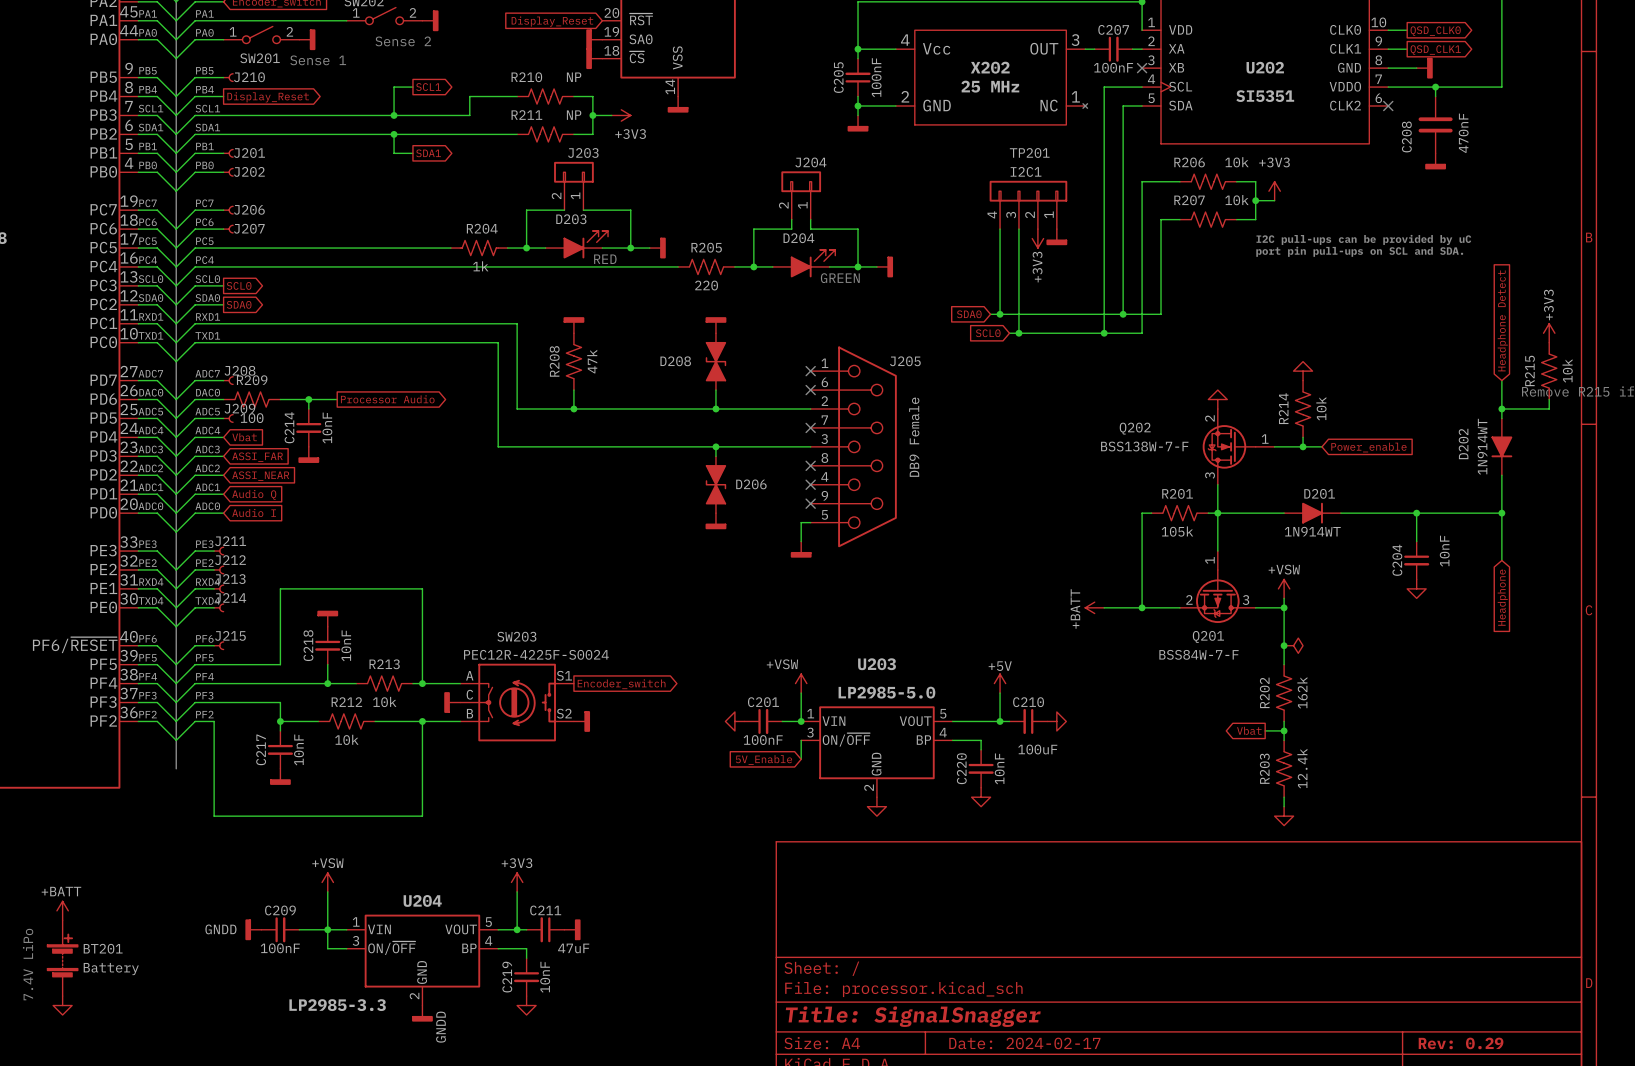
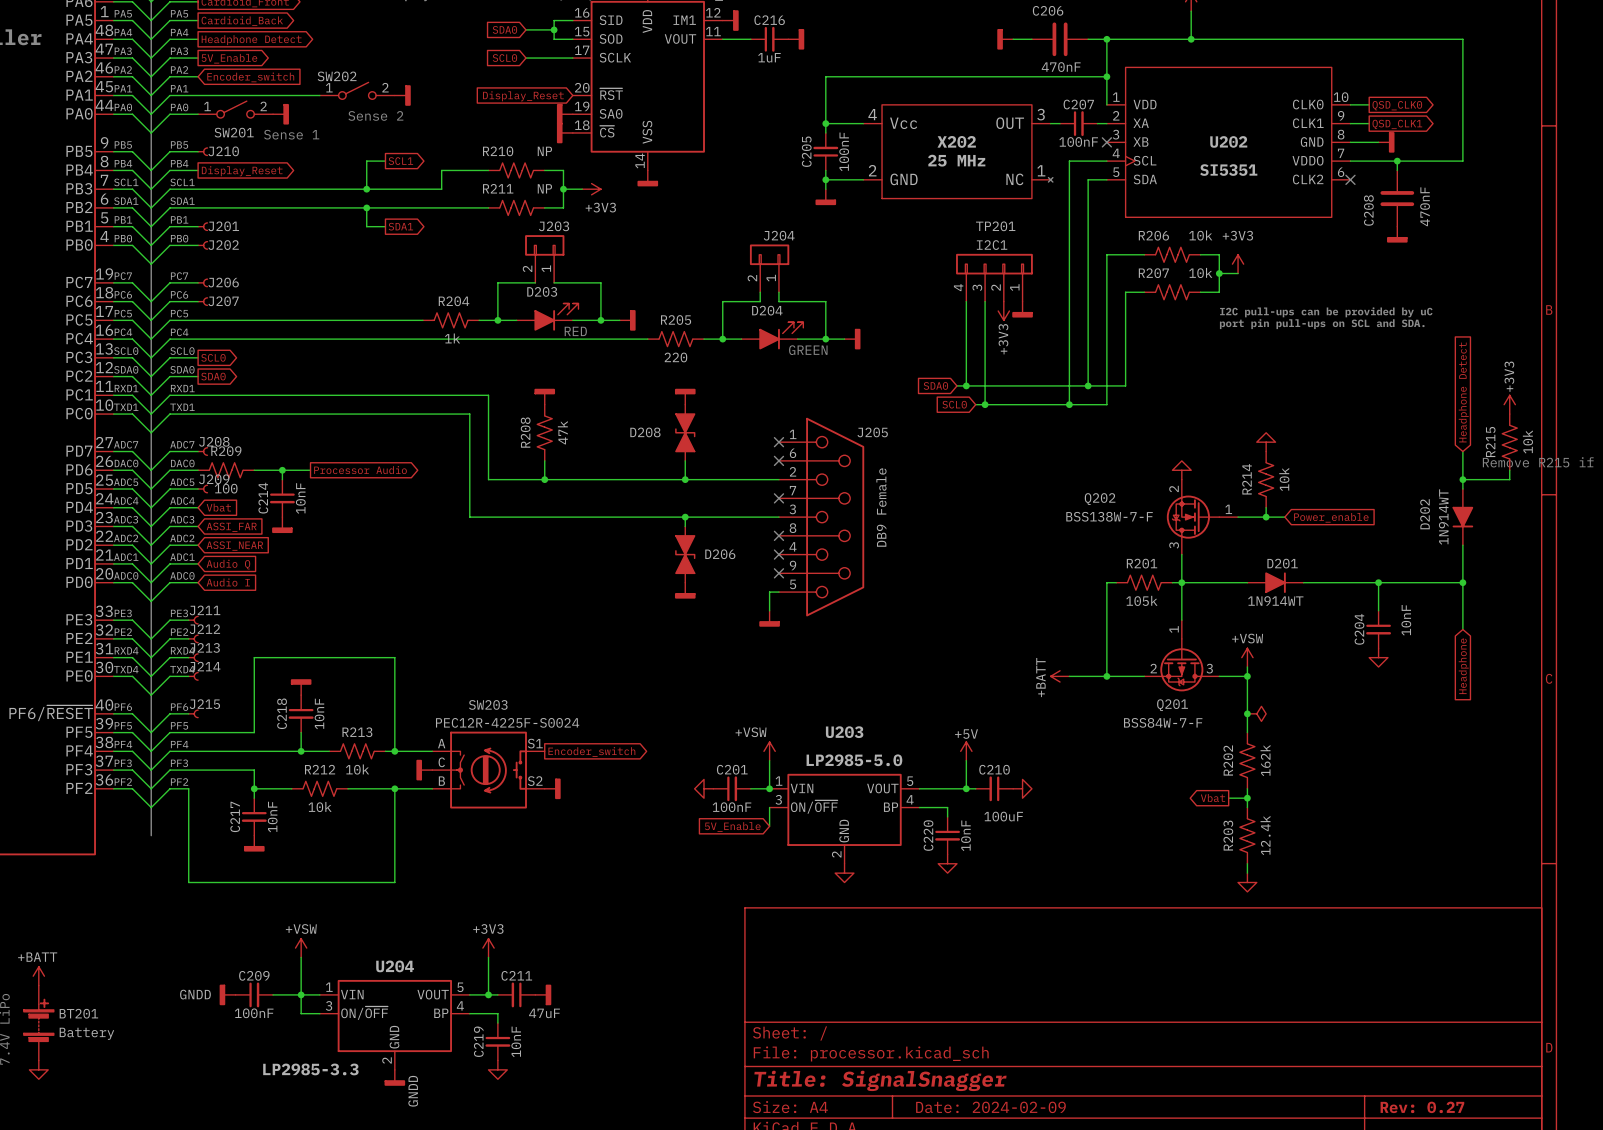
title block: Date: 2024-02-17 (1024, 1043) -> Date: 2024-02-09 (990, 1107)
title block: Rev: 0.29 (1461, 1043) -> Rev: 0.27 (1422, 1107)

